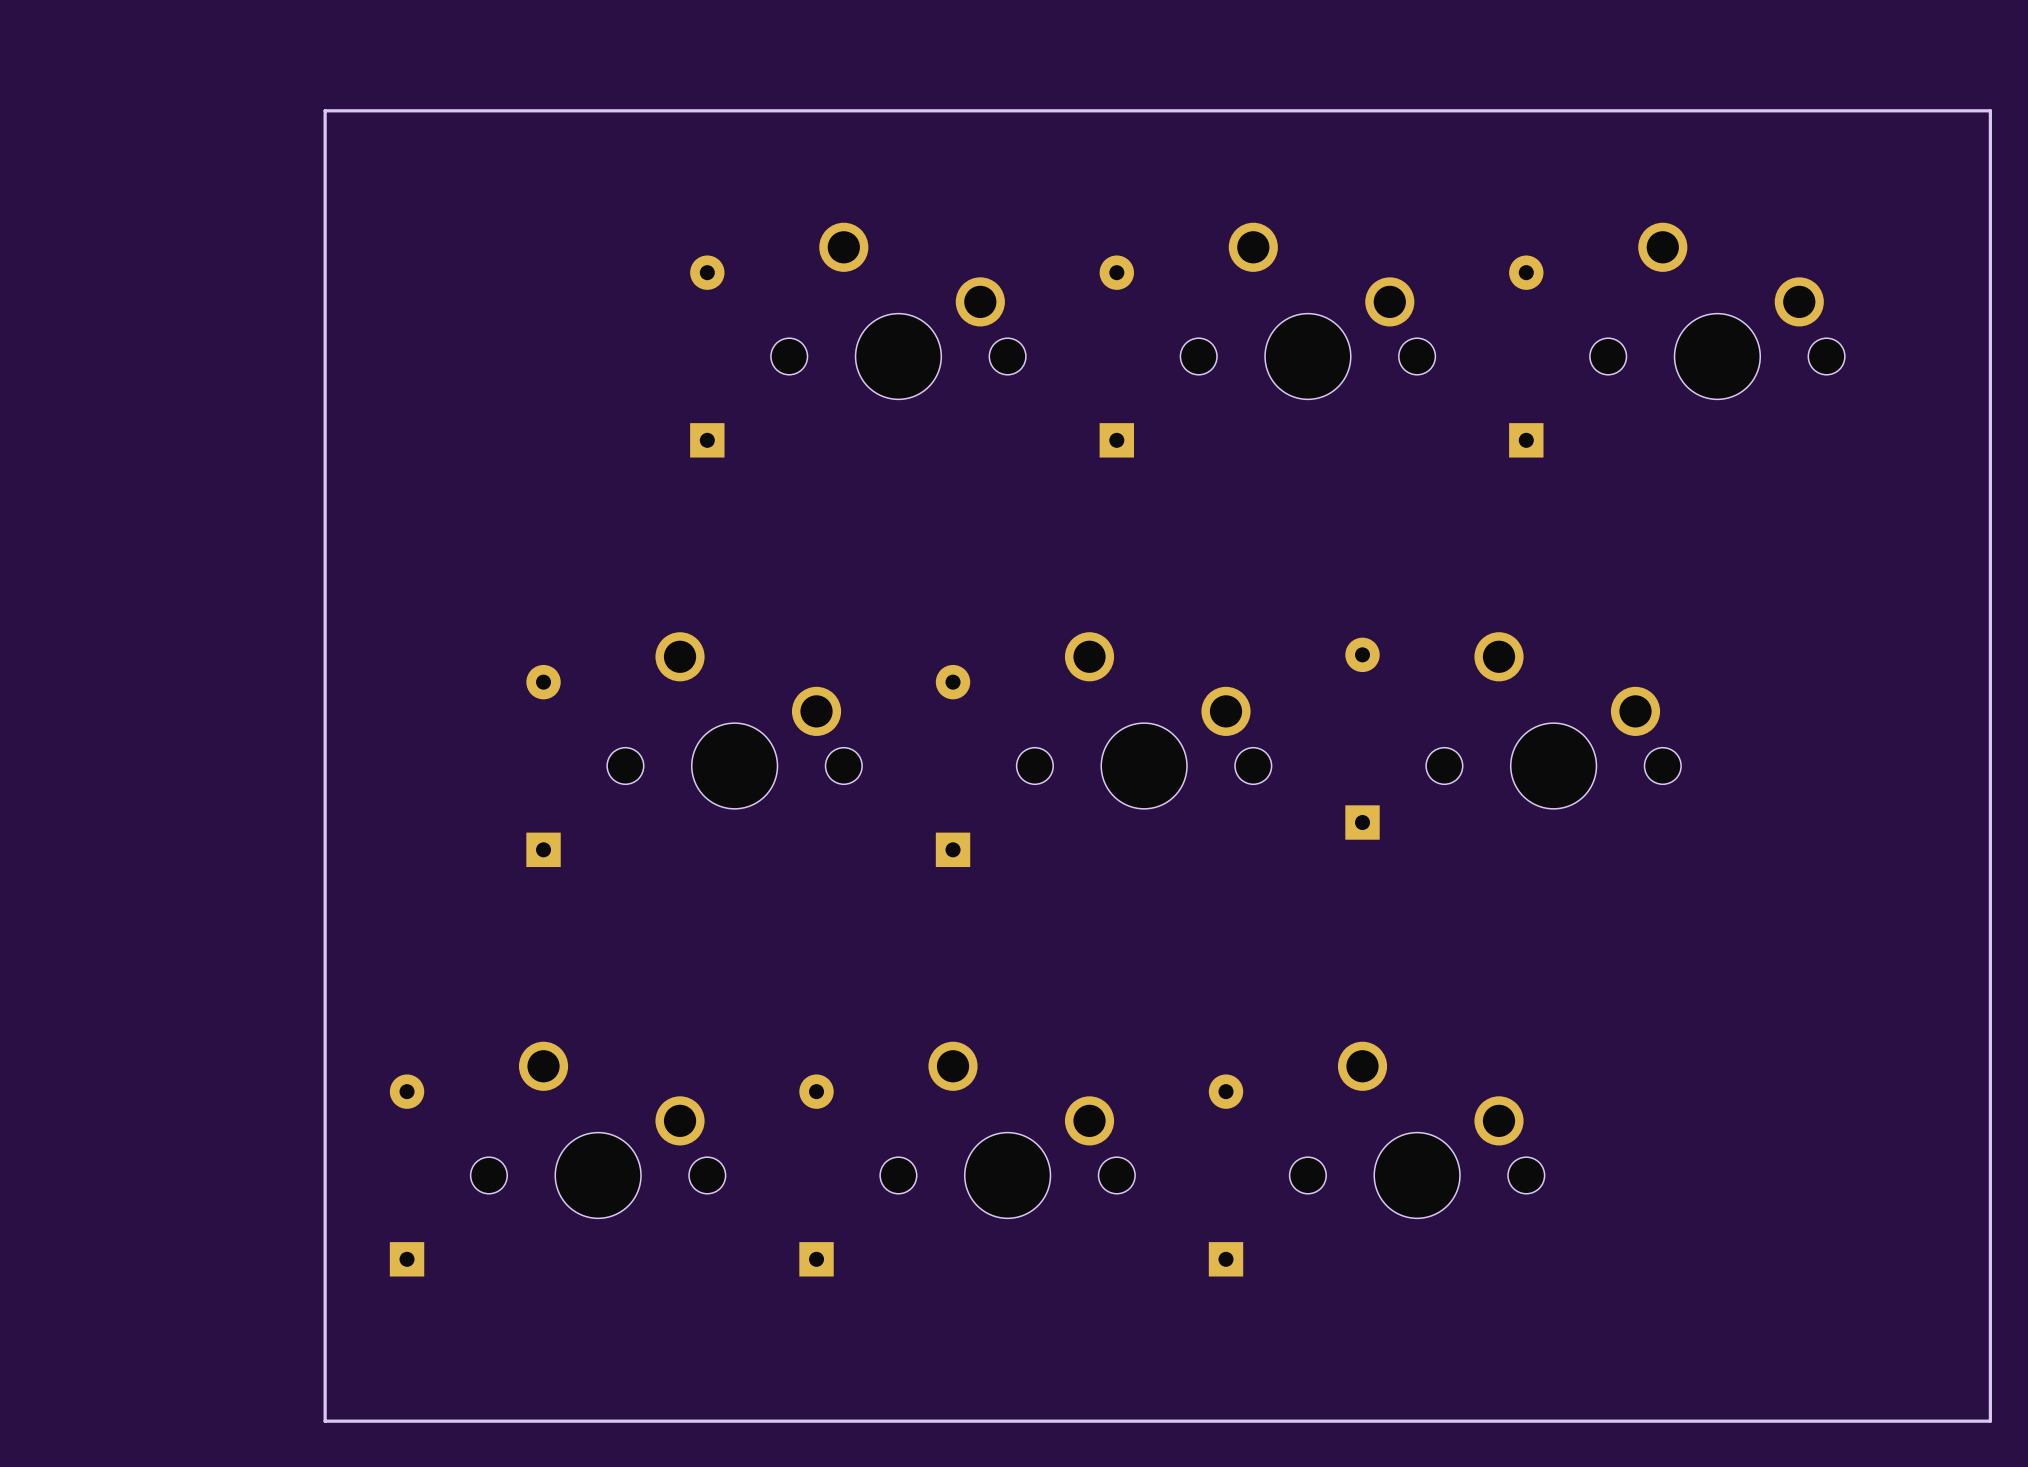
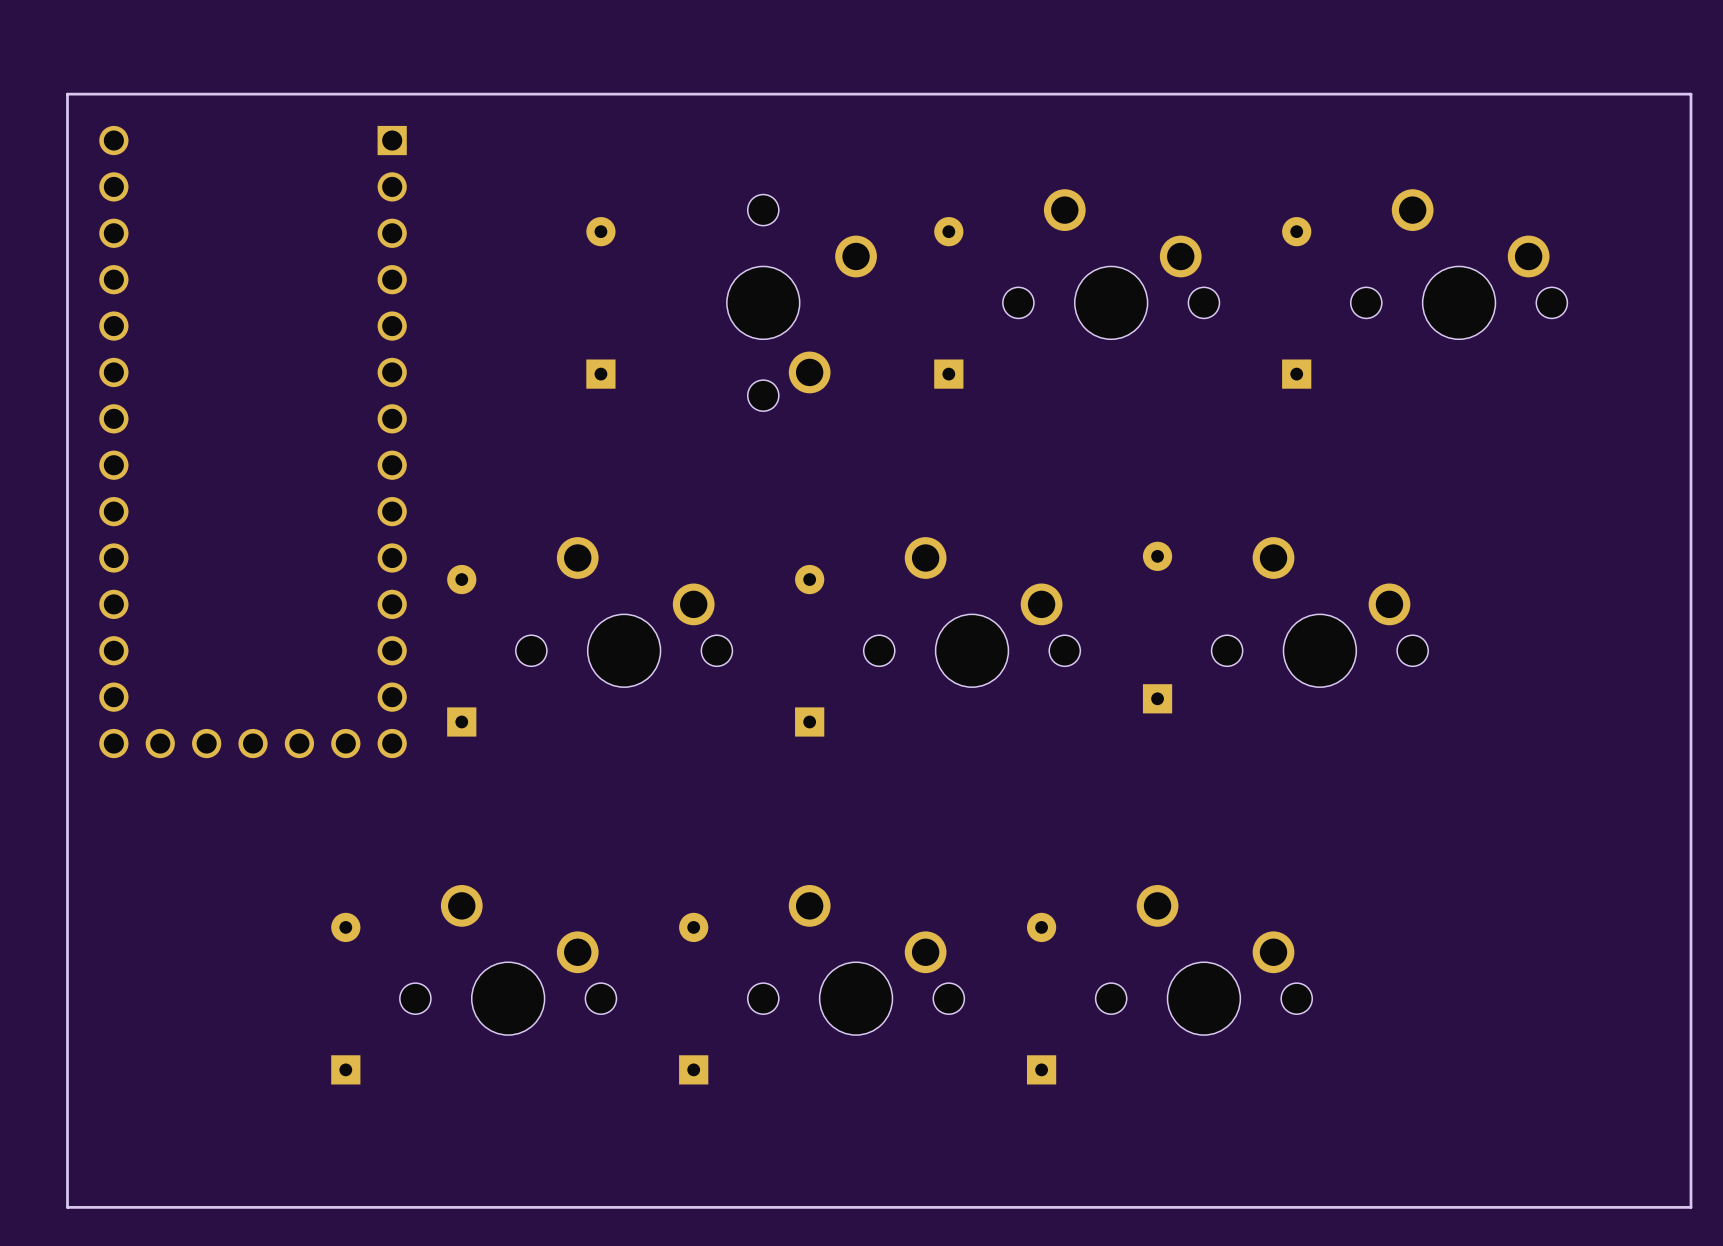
board edge: (325, 110) (325, 1421) -> (276, 94) (67, 94) (67, 1207) (276, 1207)
part rotation: 0° (898, 311) -> 90° clockwise (801, 302)
part: none -> (253, 442)

